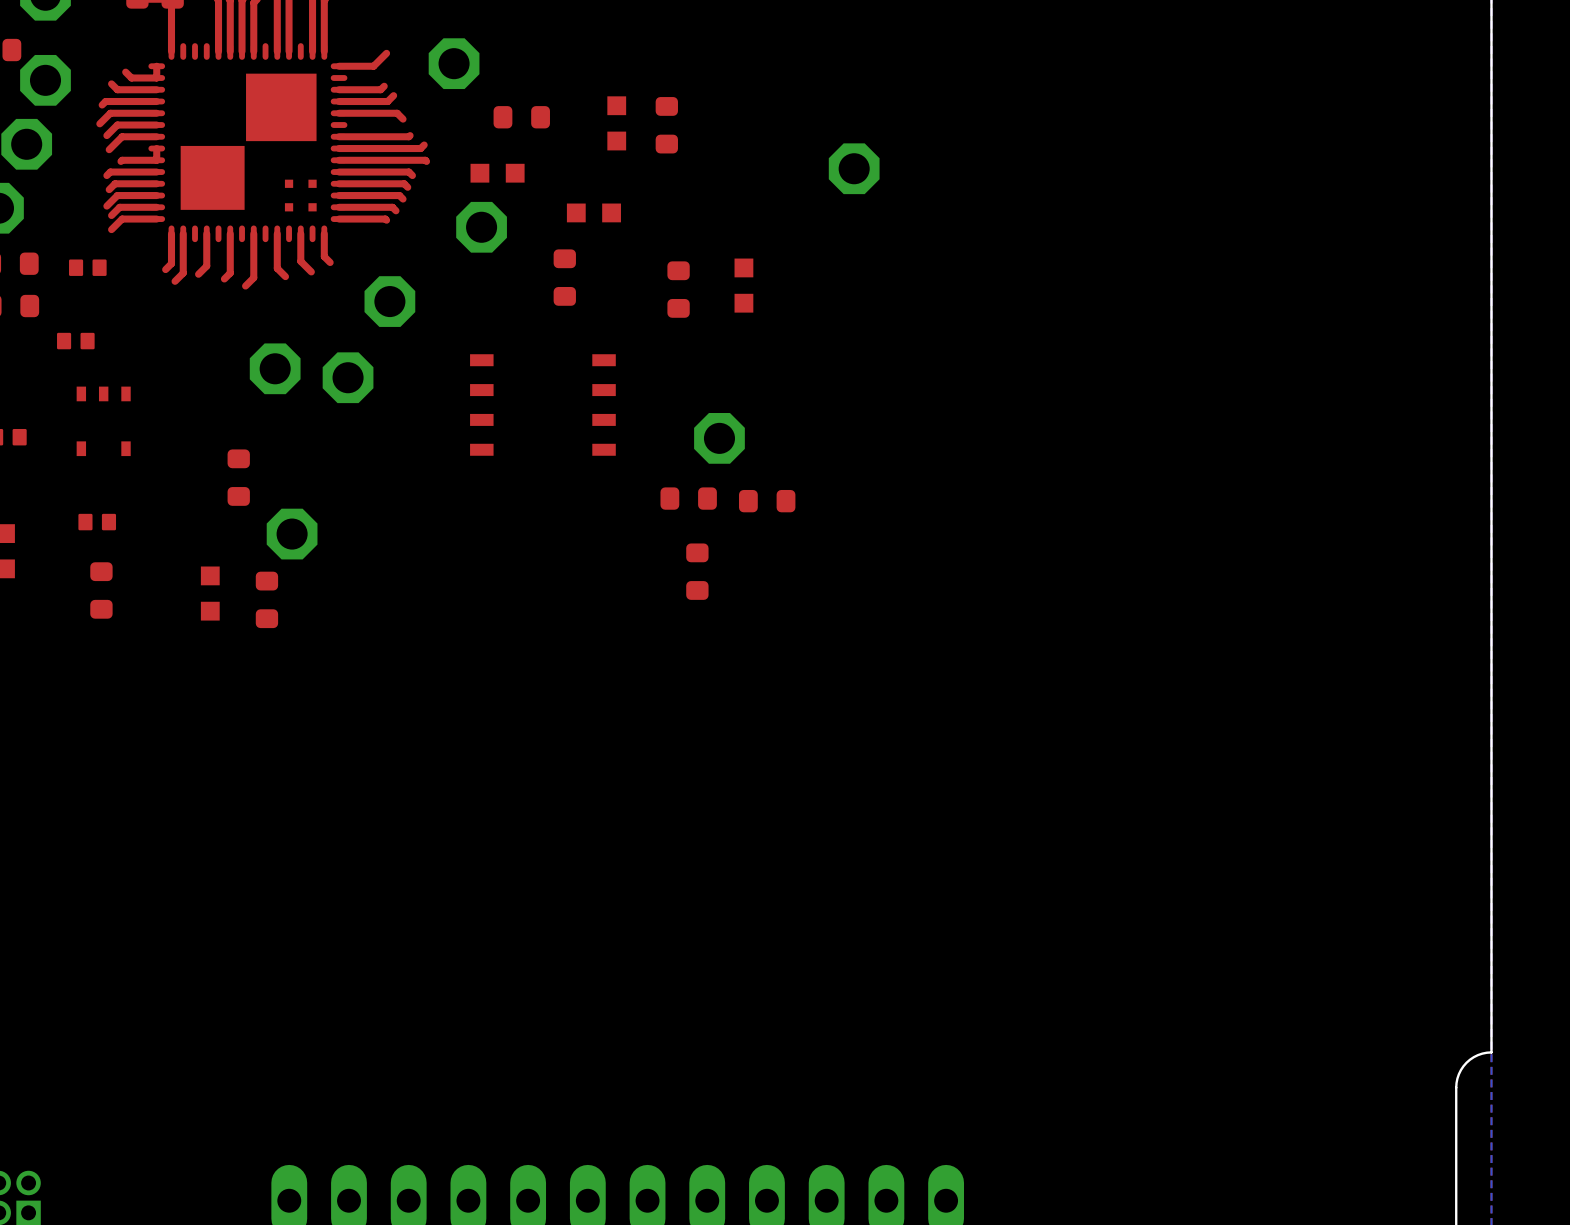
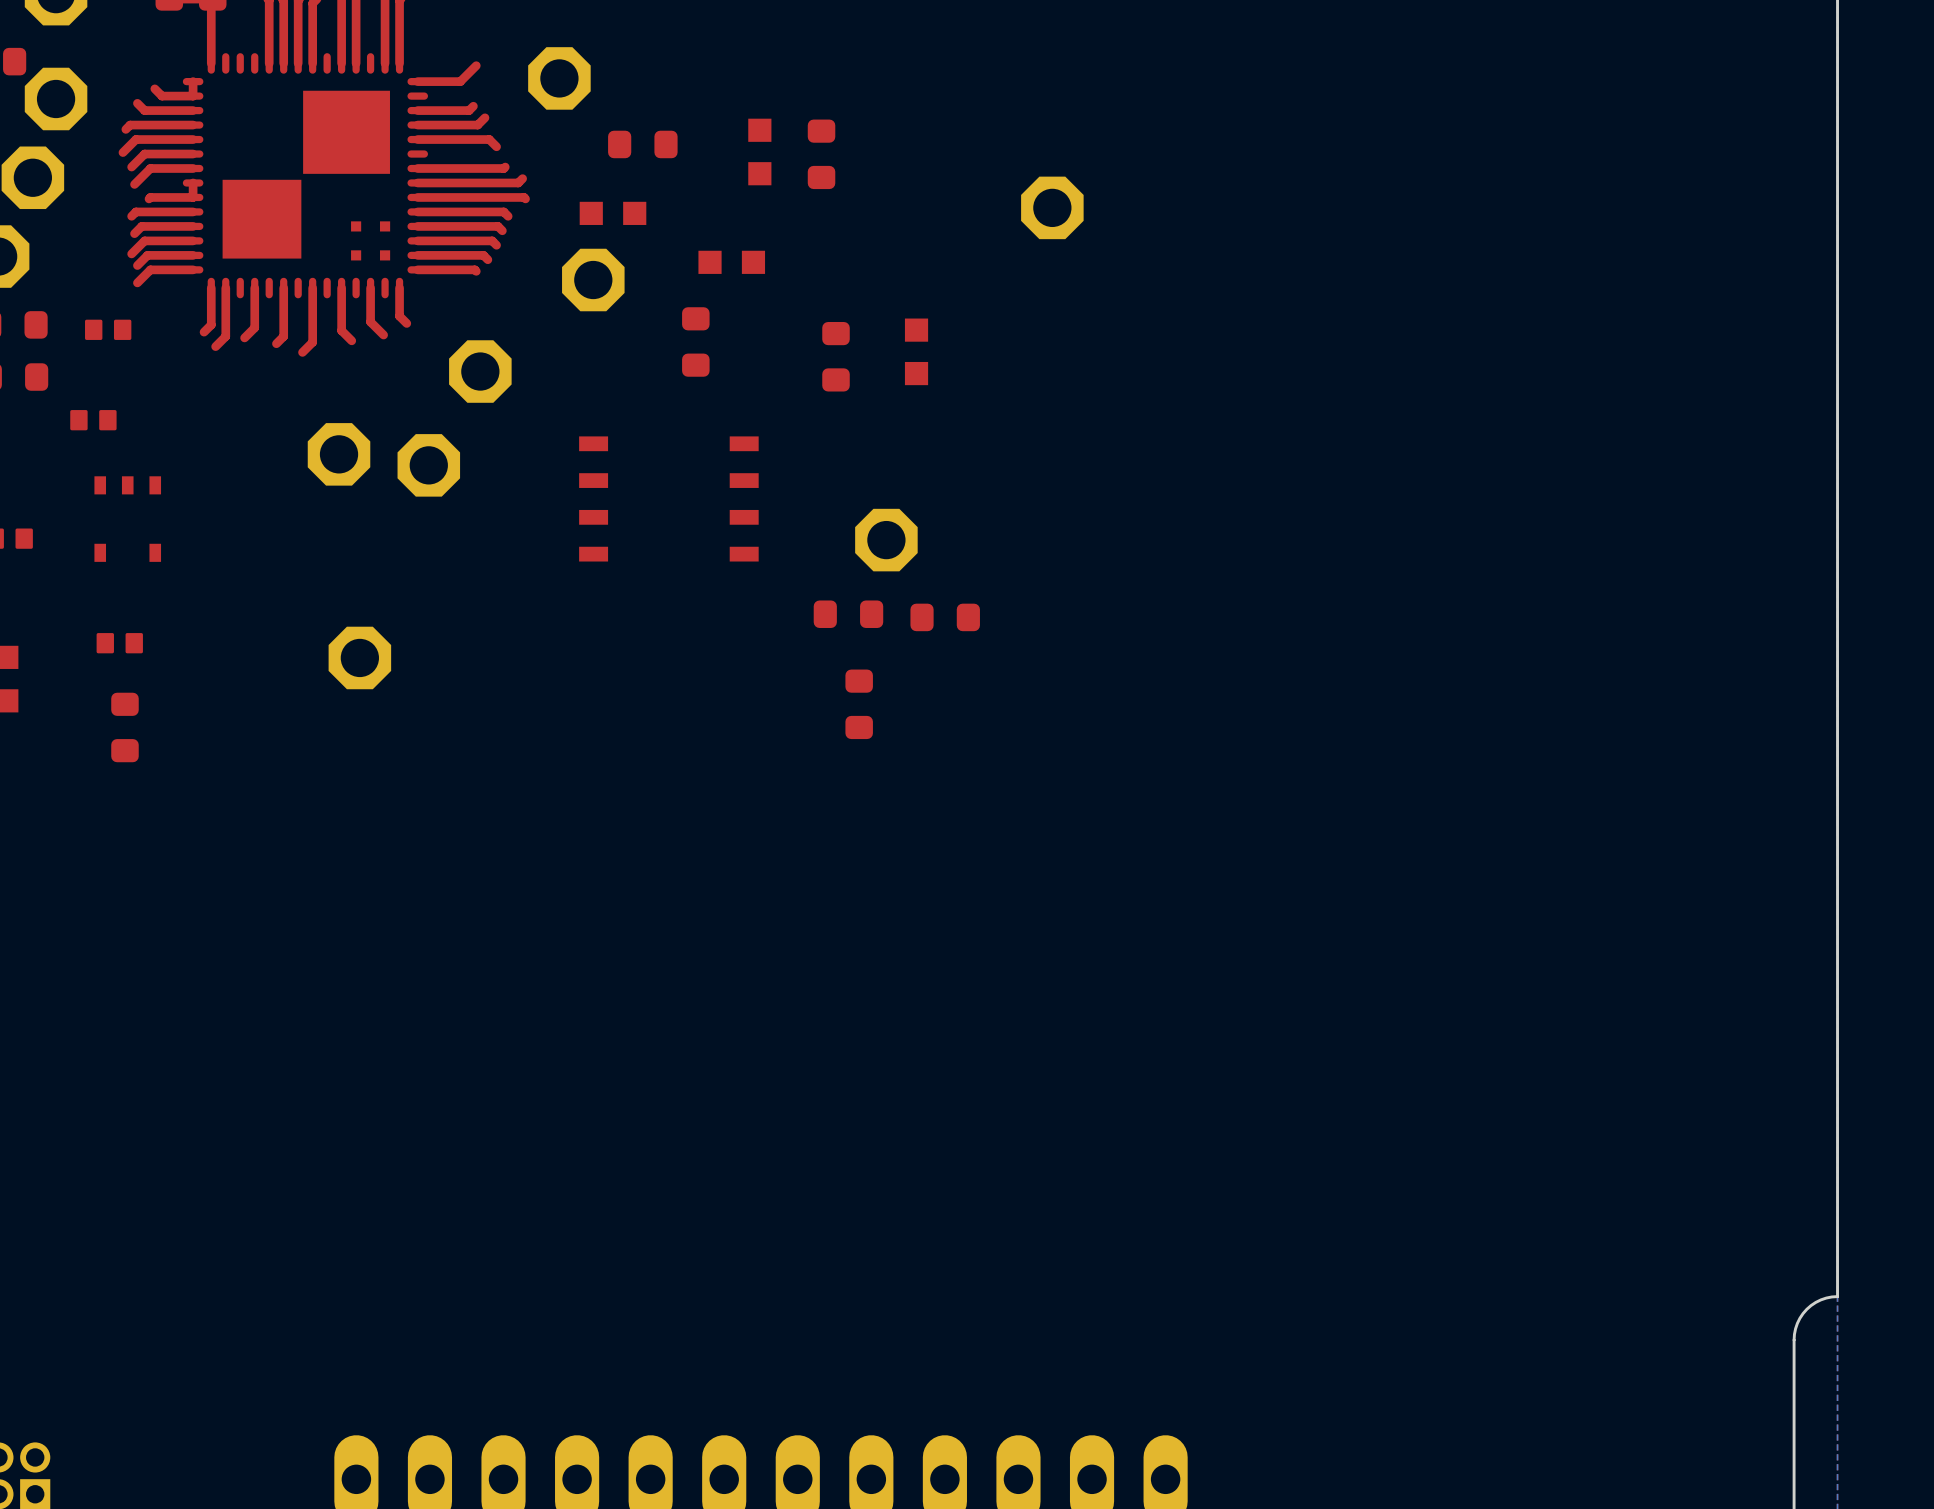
part: (238, 477) -> none
part: (210, 593) -> none
part: (266, 599) -> none

